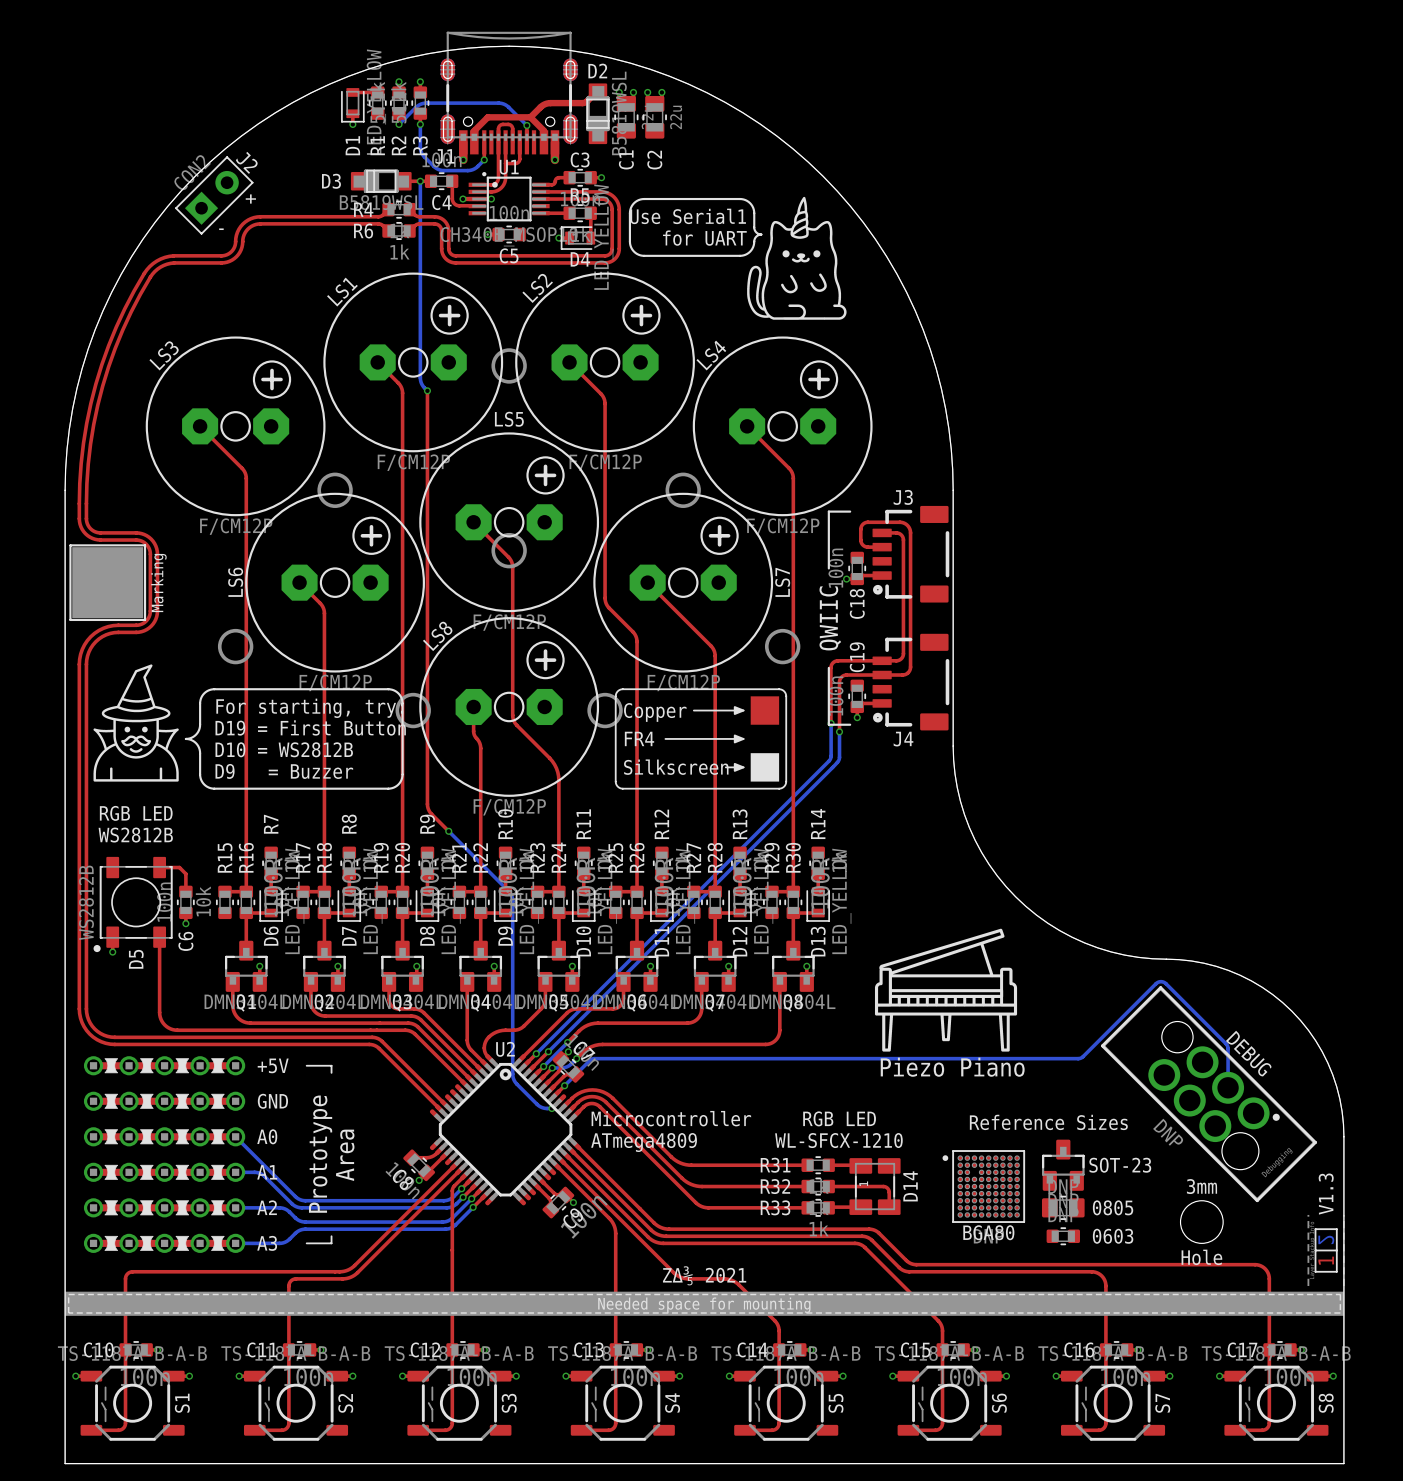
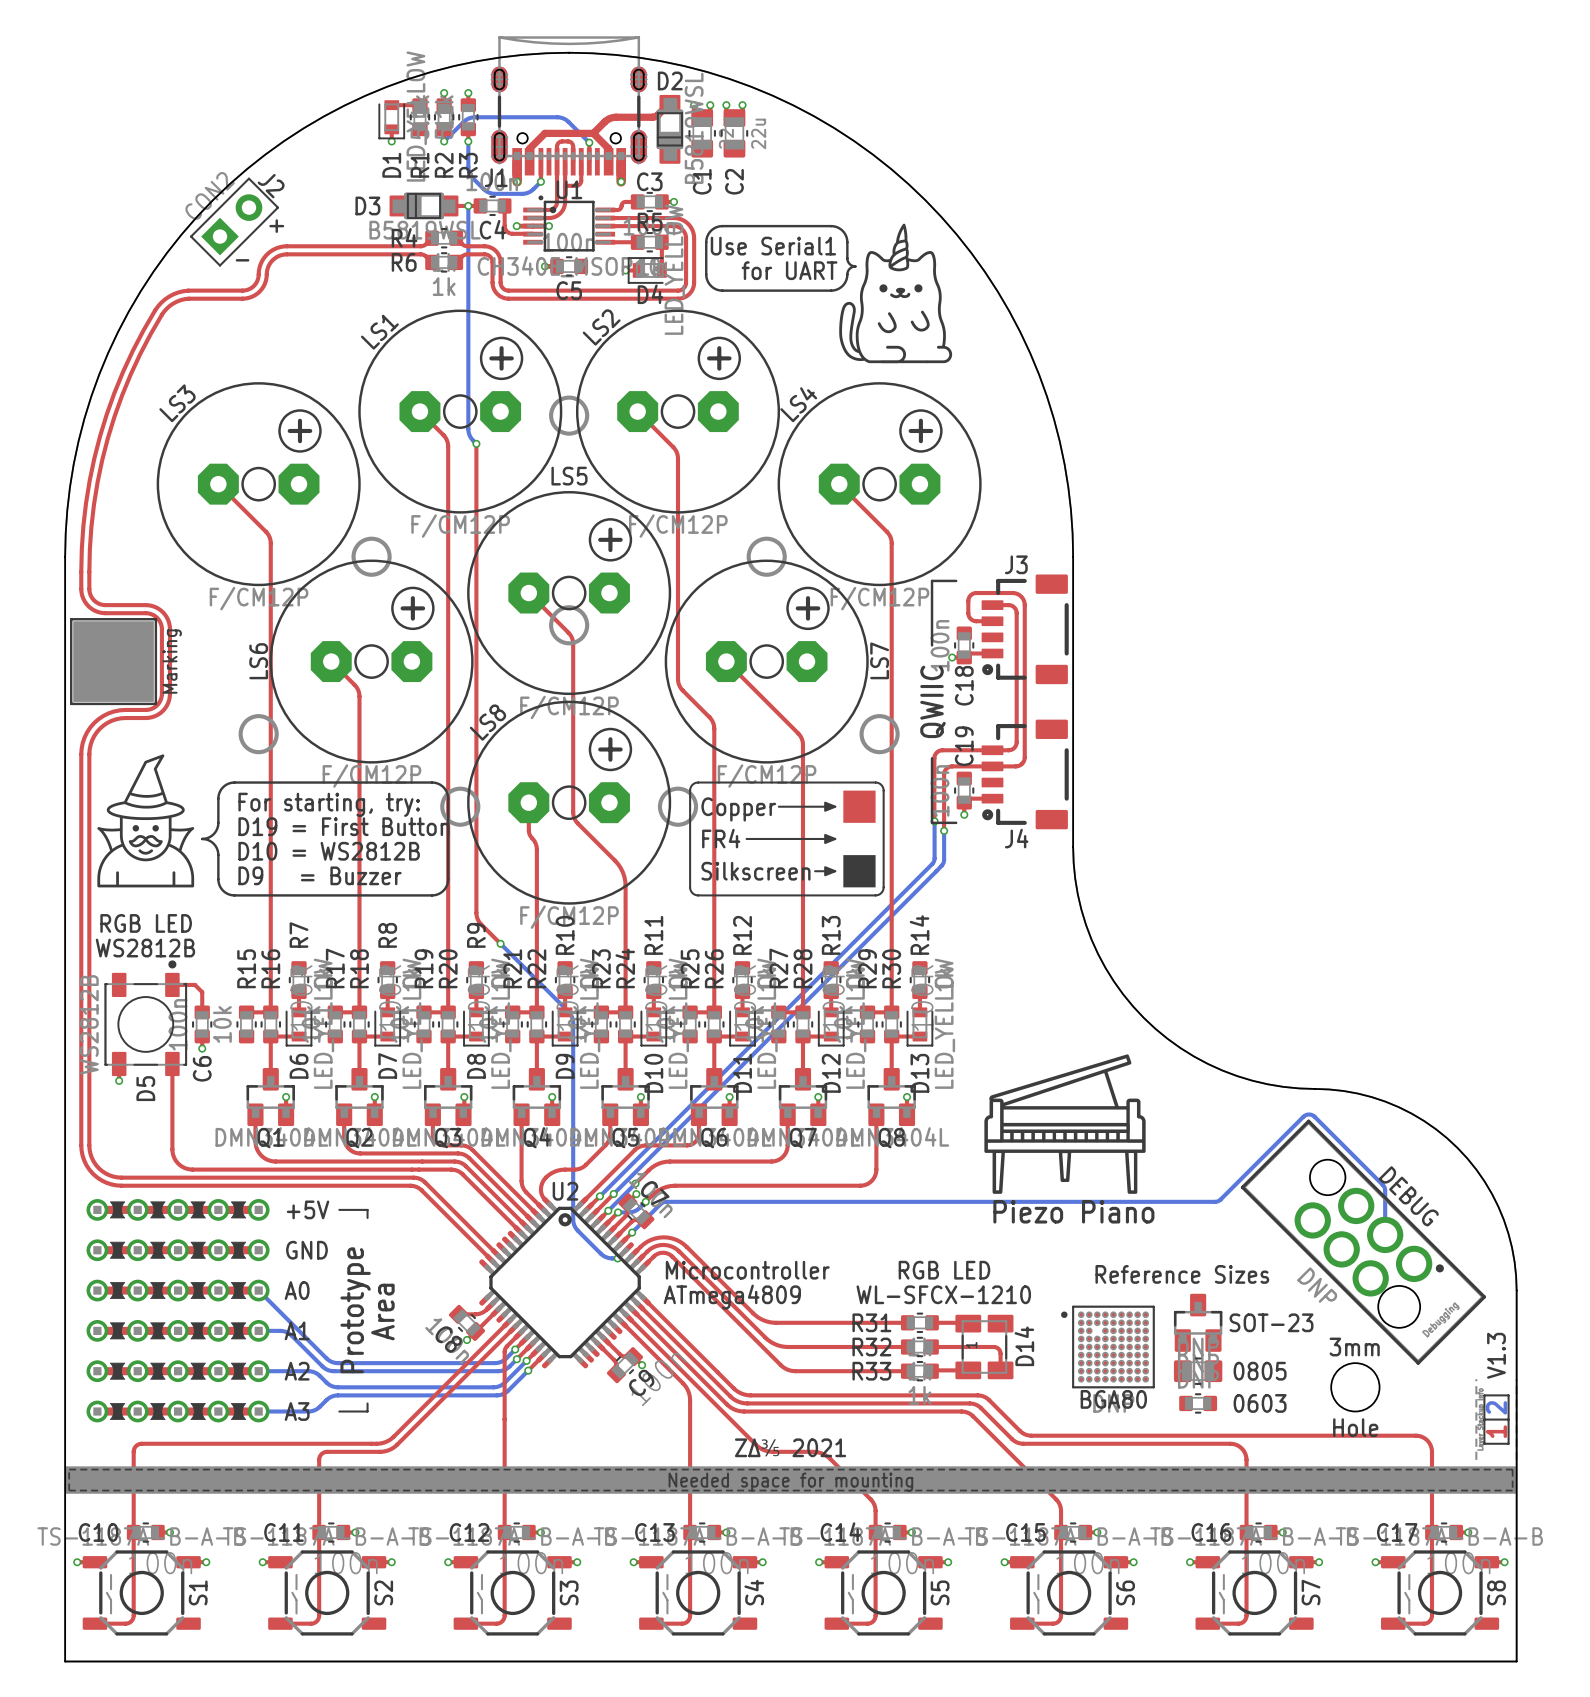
D5 footprint: [93, 856, 173, 953] -> [104, 960, 188, 1077]
drawing shape: [1307, 1214, 1345, 1287] -> [1475, 1378, 1518, 1461]

